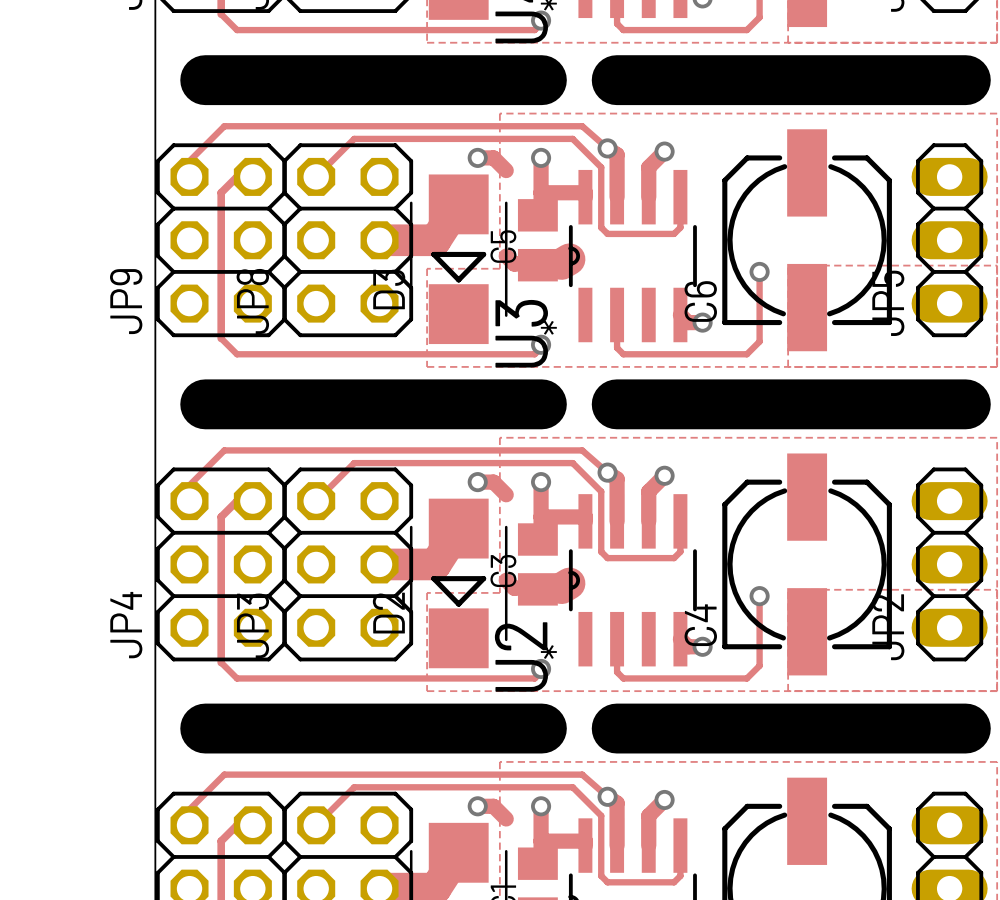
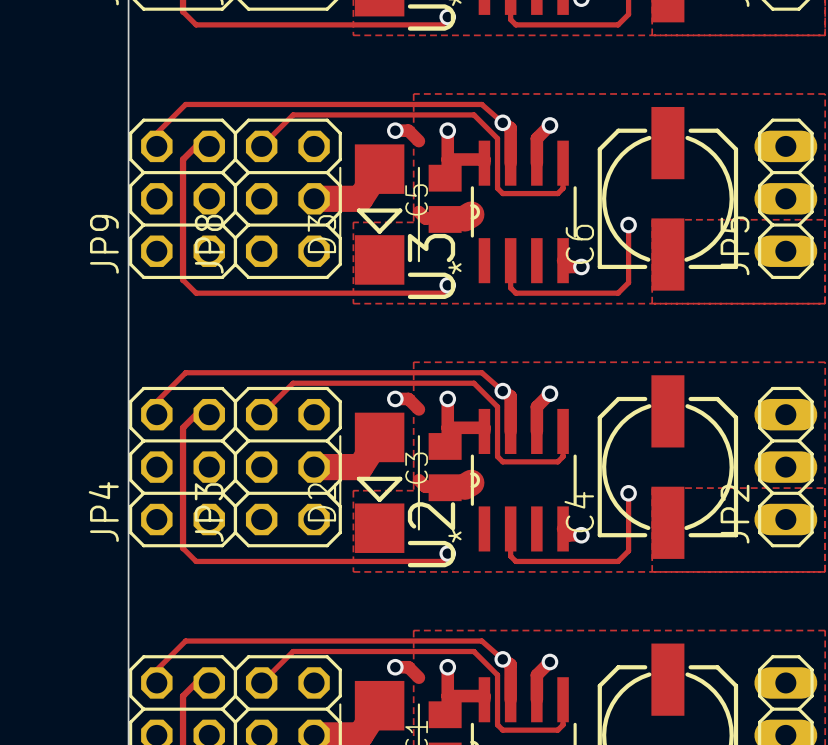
board edge: (205, 80) (541, 80) -> none
board edge: (616, 80) (965, 80) -> none
board edge: (205, 404) (541, 404) -> none
board edge: (616, 404) (965, 404) -> none
board edge: (205, 728) (541, 728) -> none
board edge: (616, 728) (965, 728) -> none

